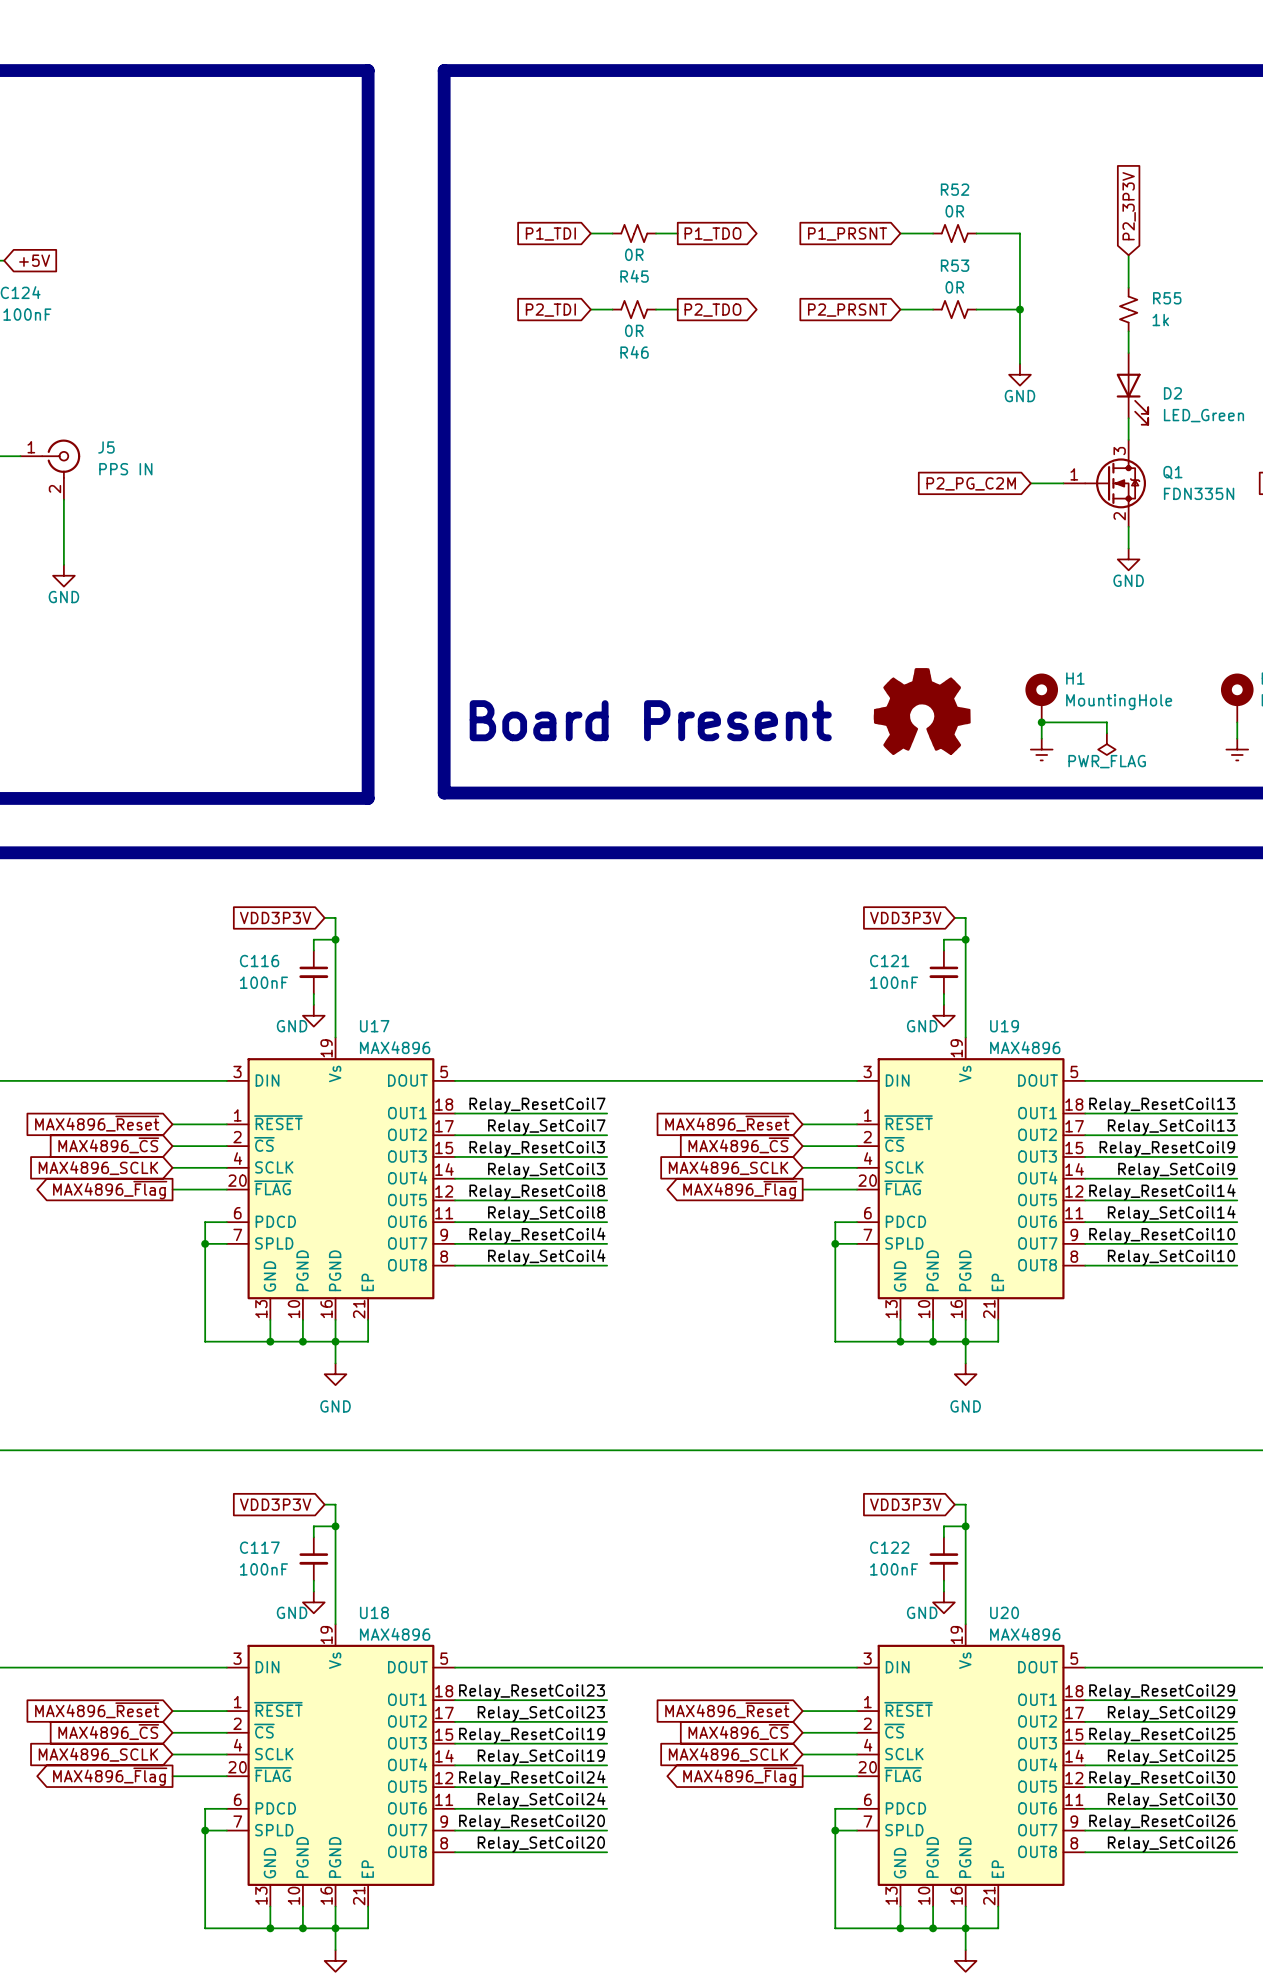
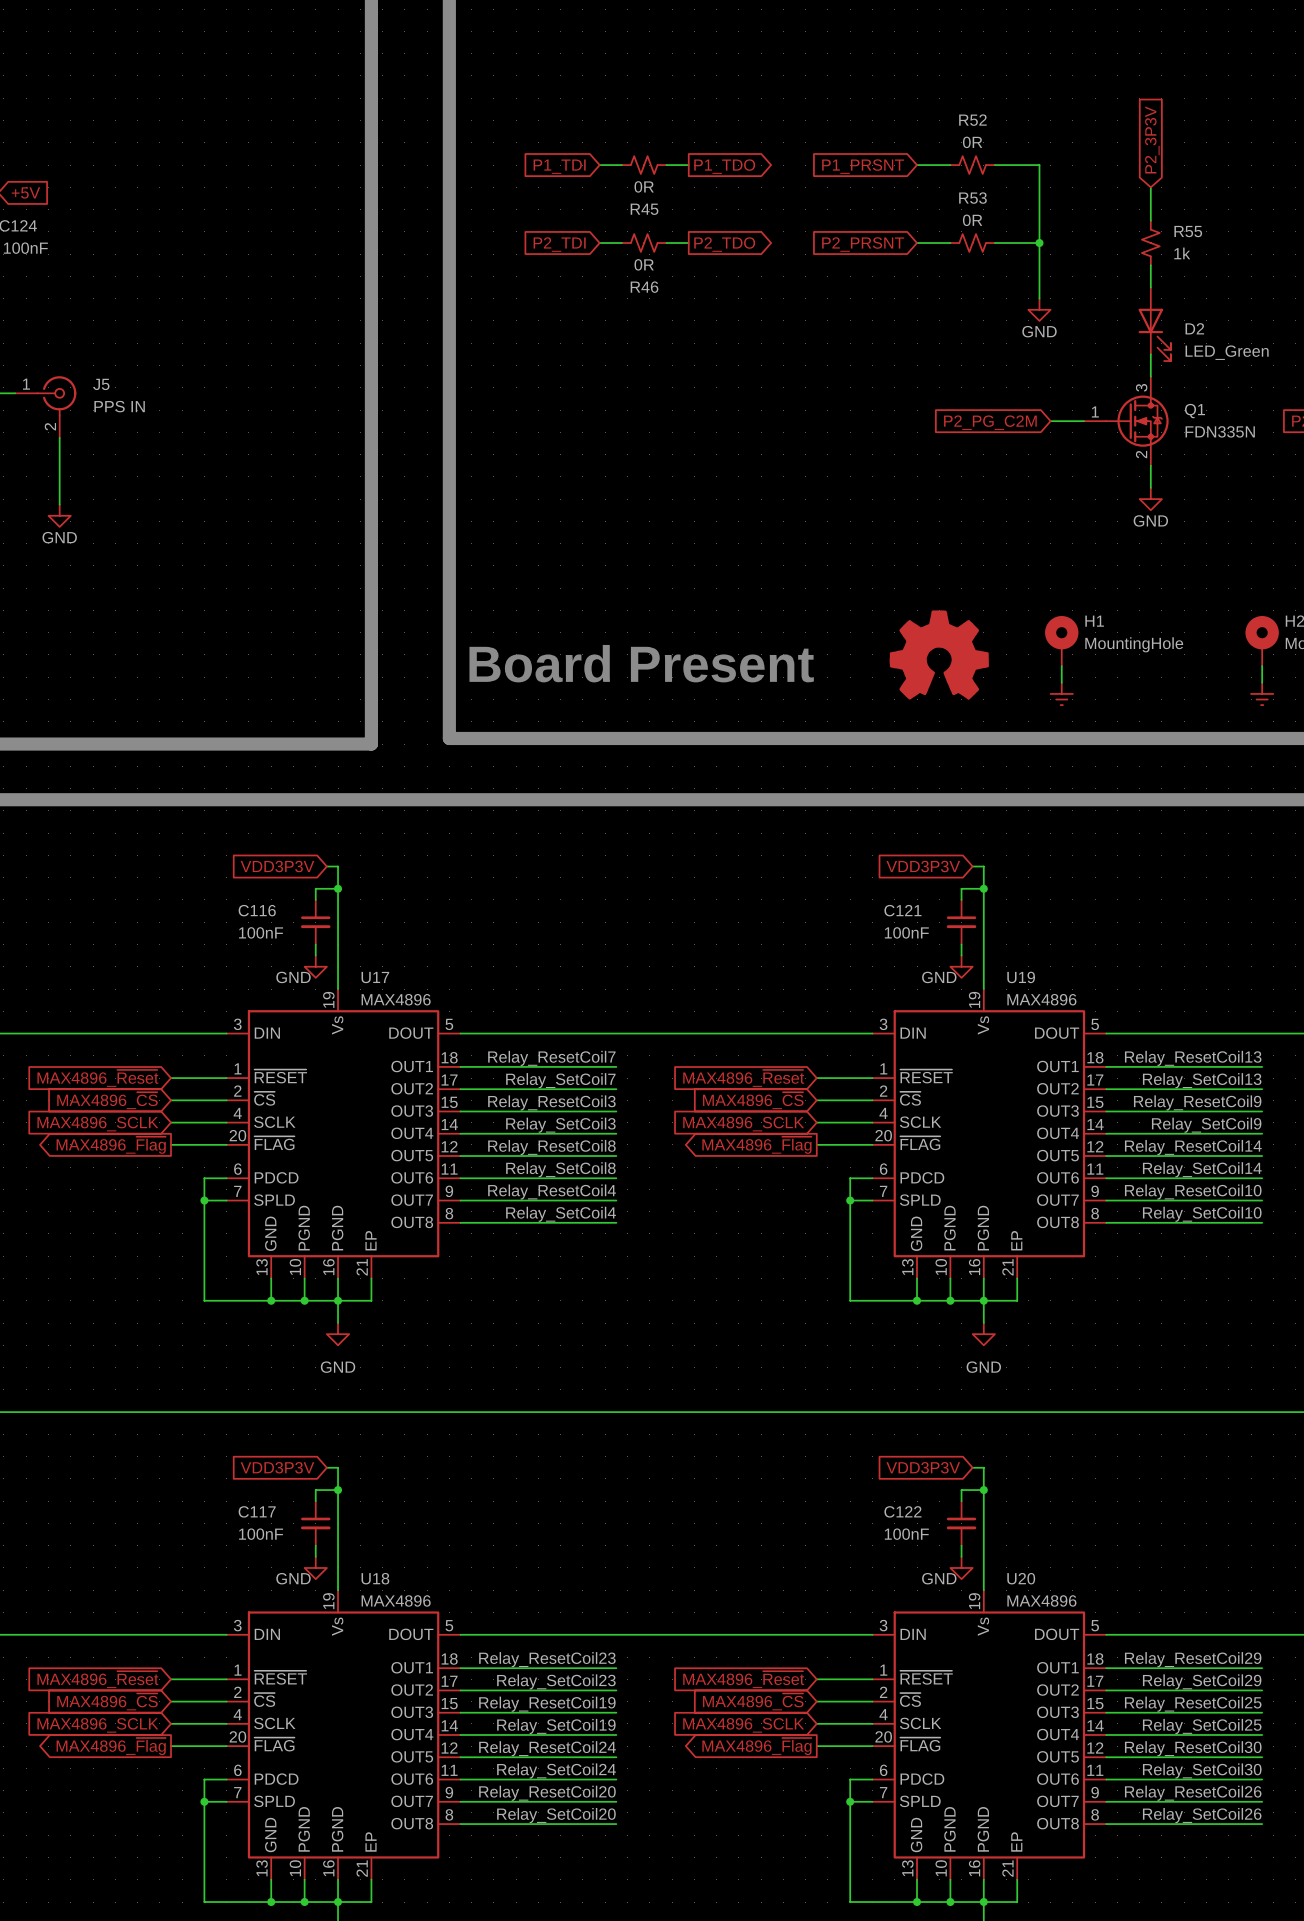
wire: (1041, 722) (1106, 722) (1106, 733) -> none
junction: (1041, 722) -> none
power symbol: PWR_FLAG (1106, 744) -> none

